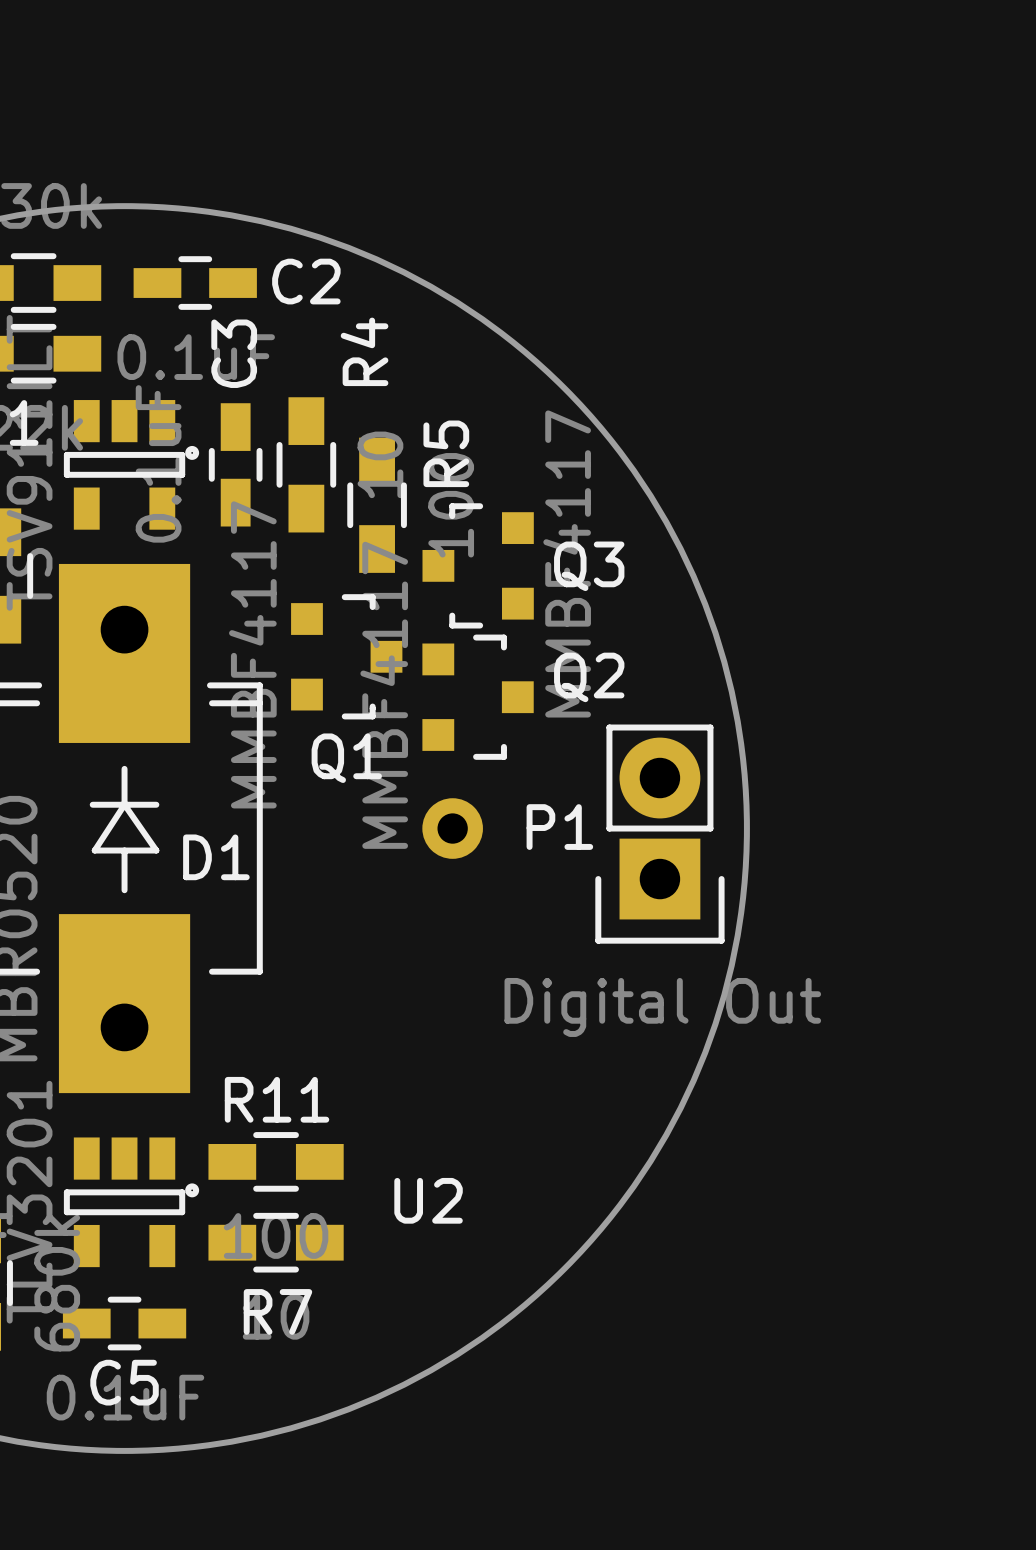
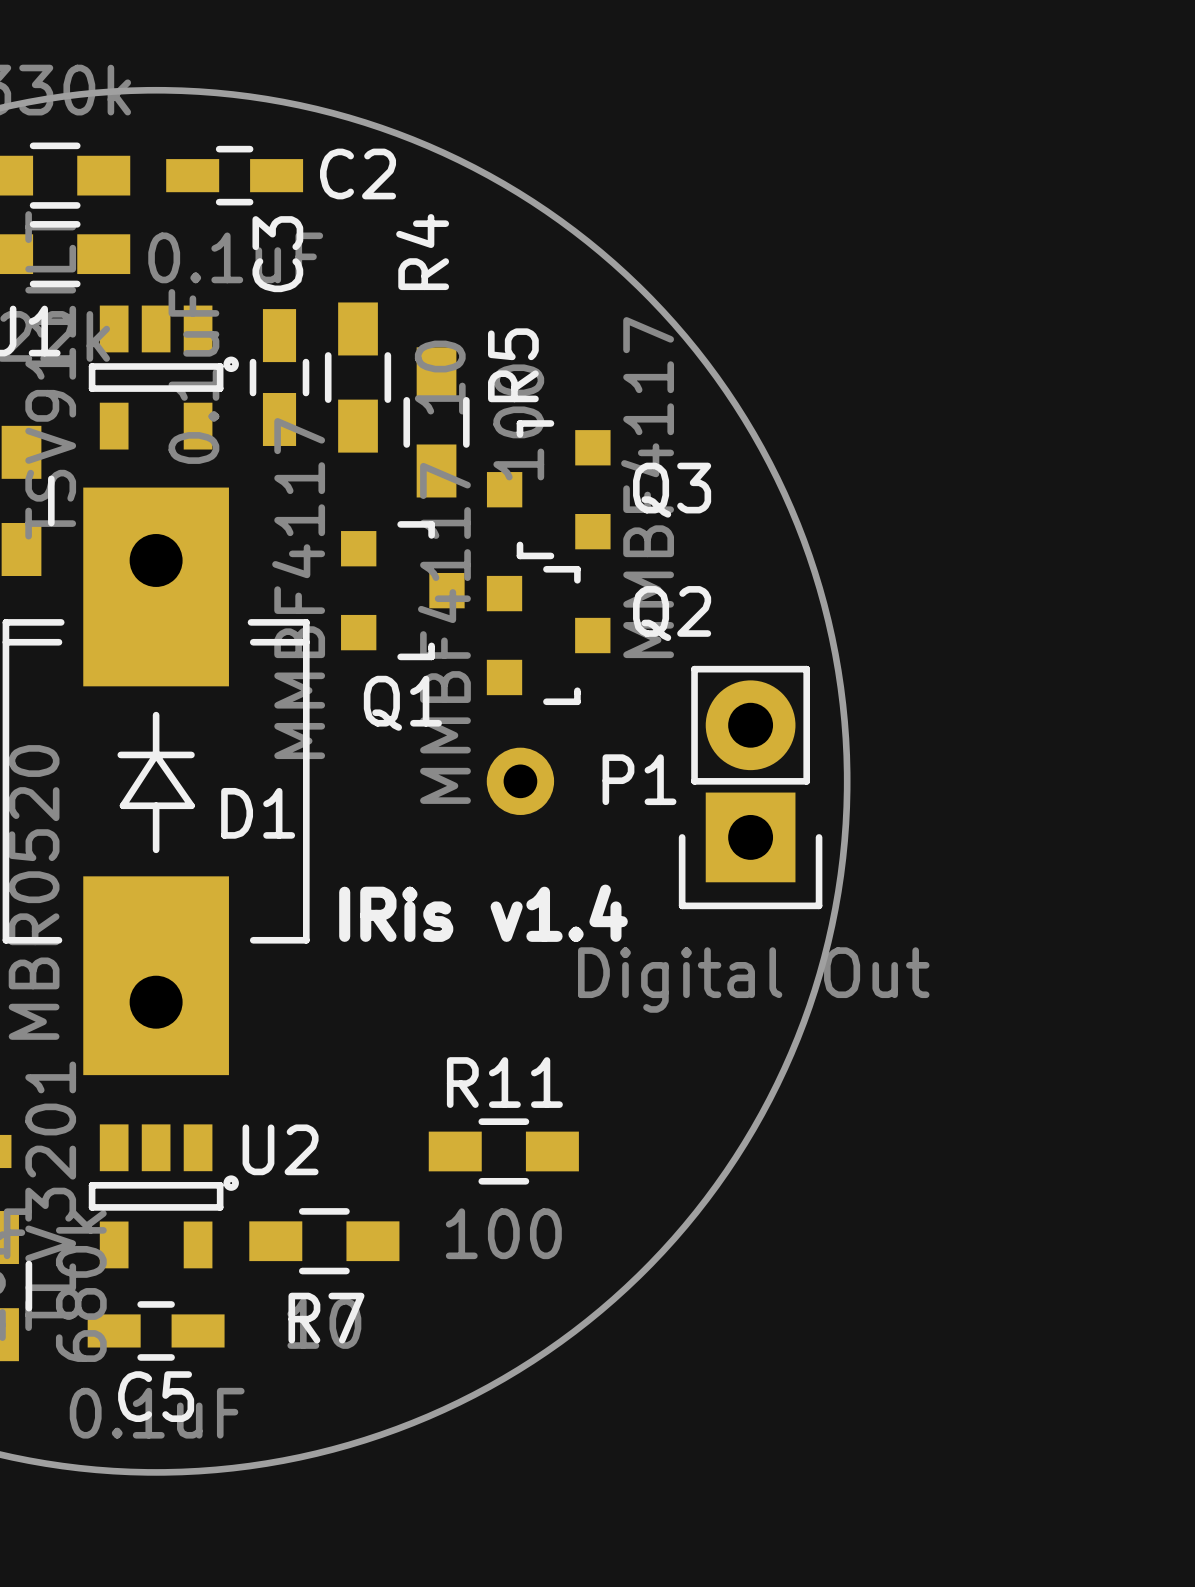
text: none -> IRis v1.4 (483, 913)
R11 position: (276, 1161) -> (503, 1151)
U2 name position: U2 (428, 1200) -> U2 (280, 1149)

